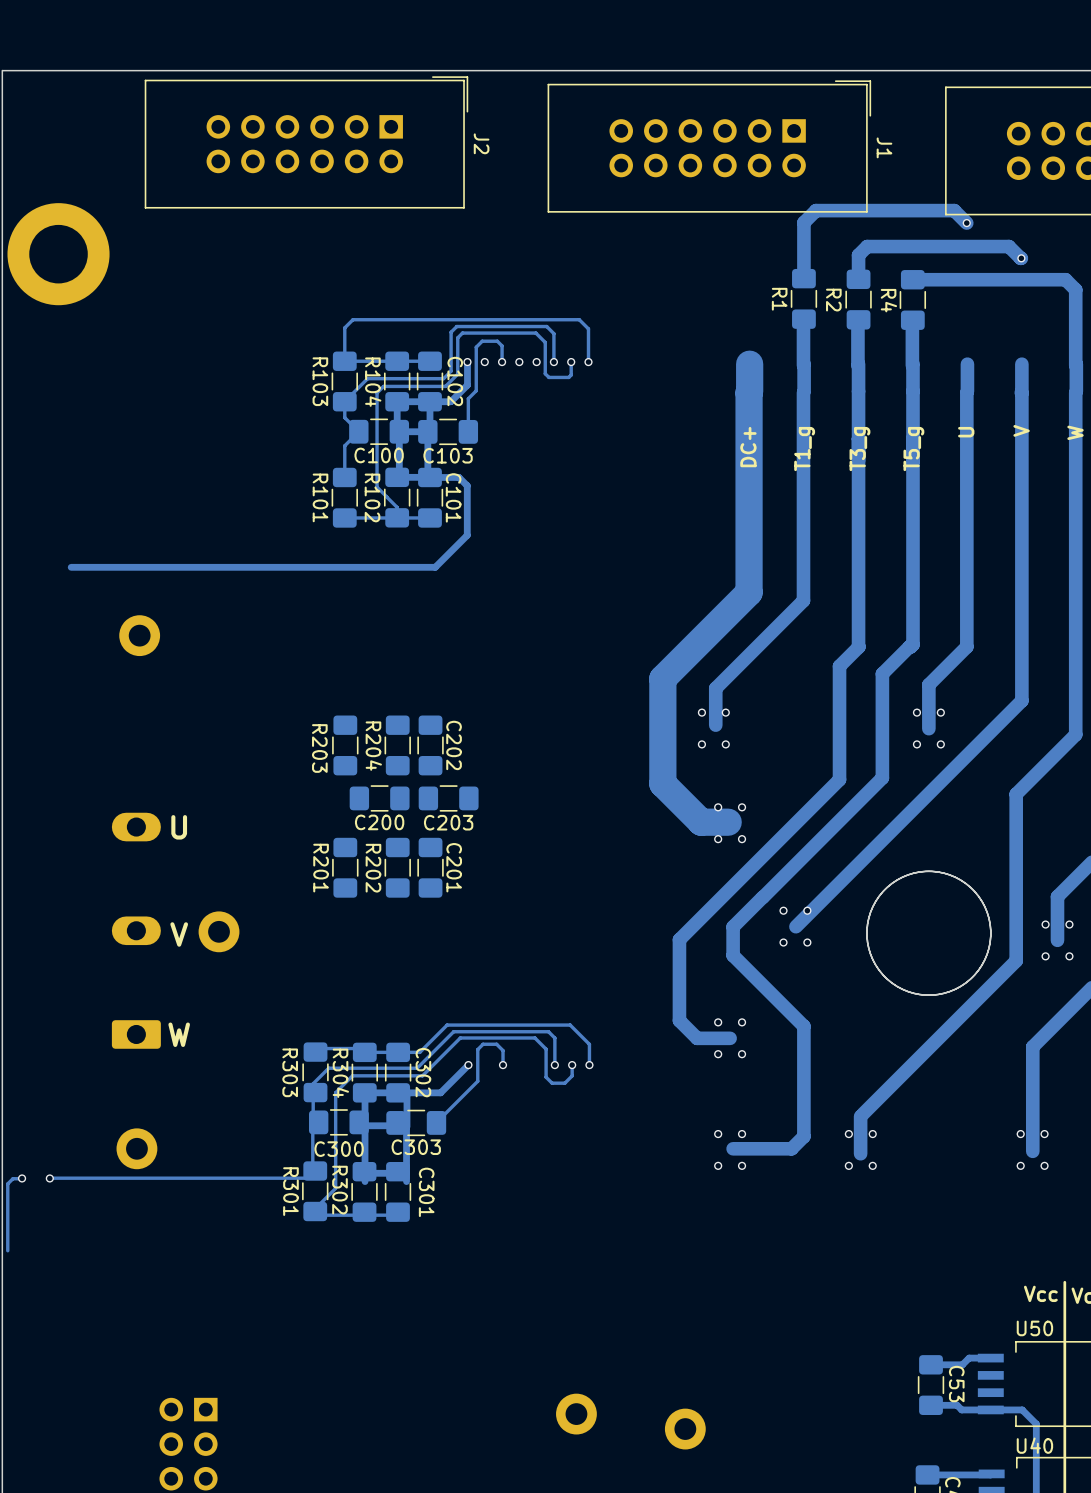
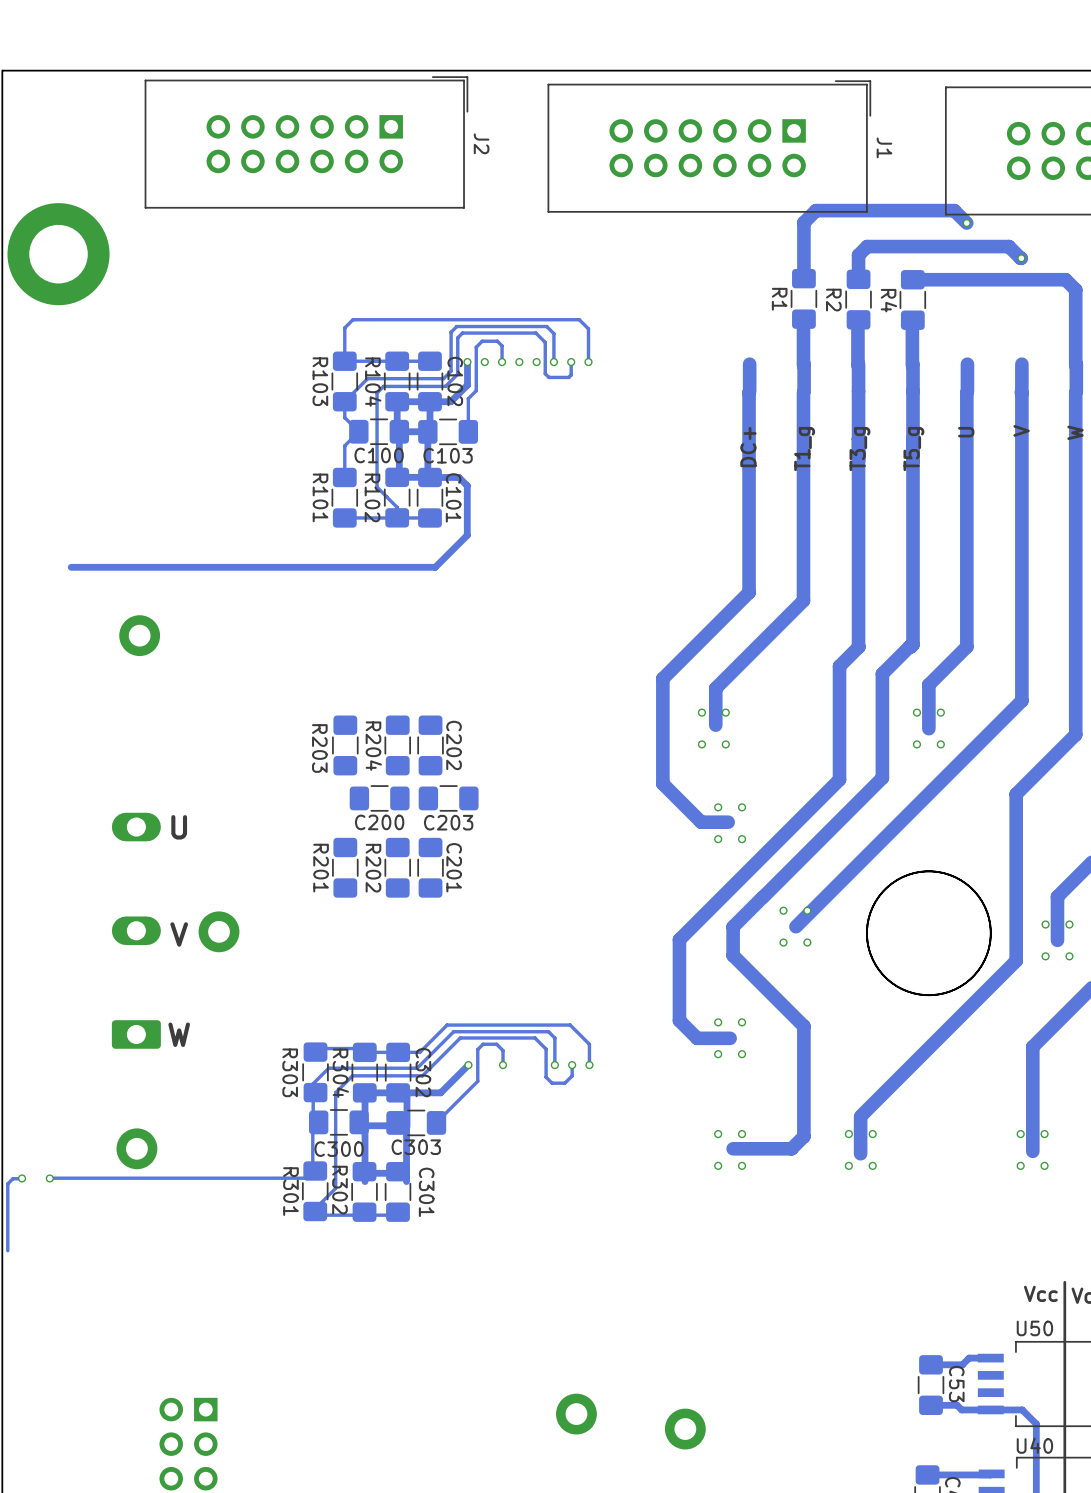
track width: thick (749, 364) (749, 391) -> thin (749, 364) (749, 391)
track width: thick (749, 392) (749, 592) (662, 678) (662, 783) (701, 822) (728, 822) -> thin (749, 392) (749, 592) (662, 678) (662, 783) (701, 822) (728, 822)

